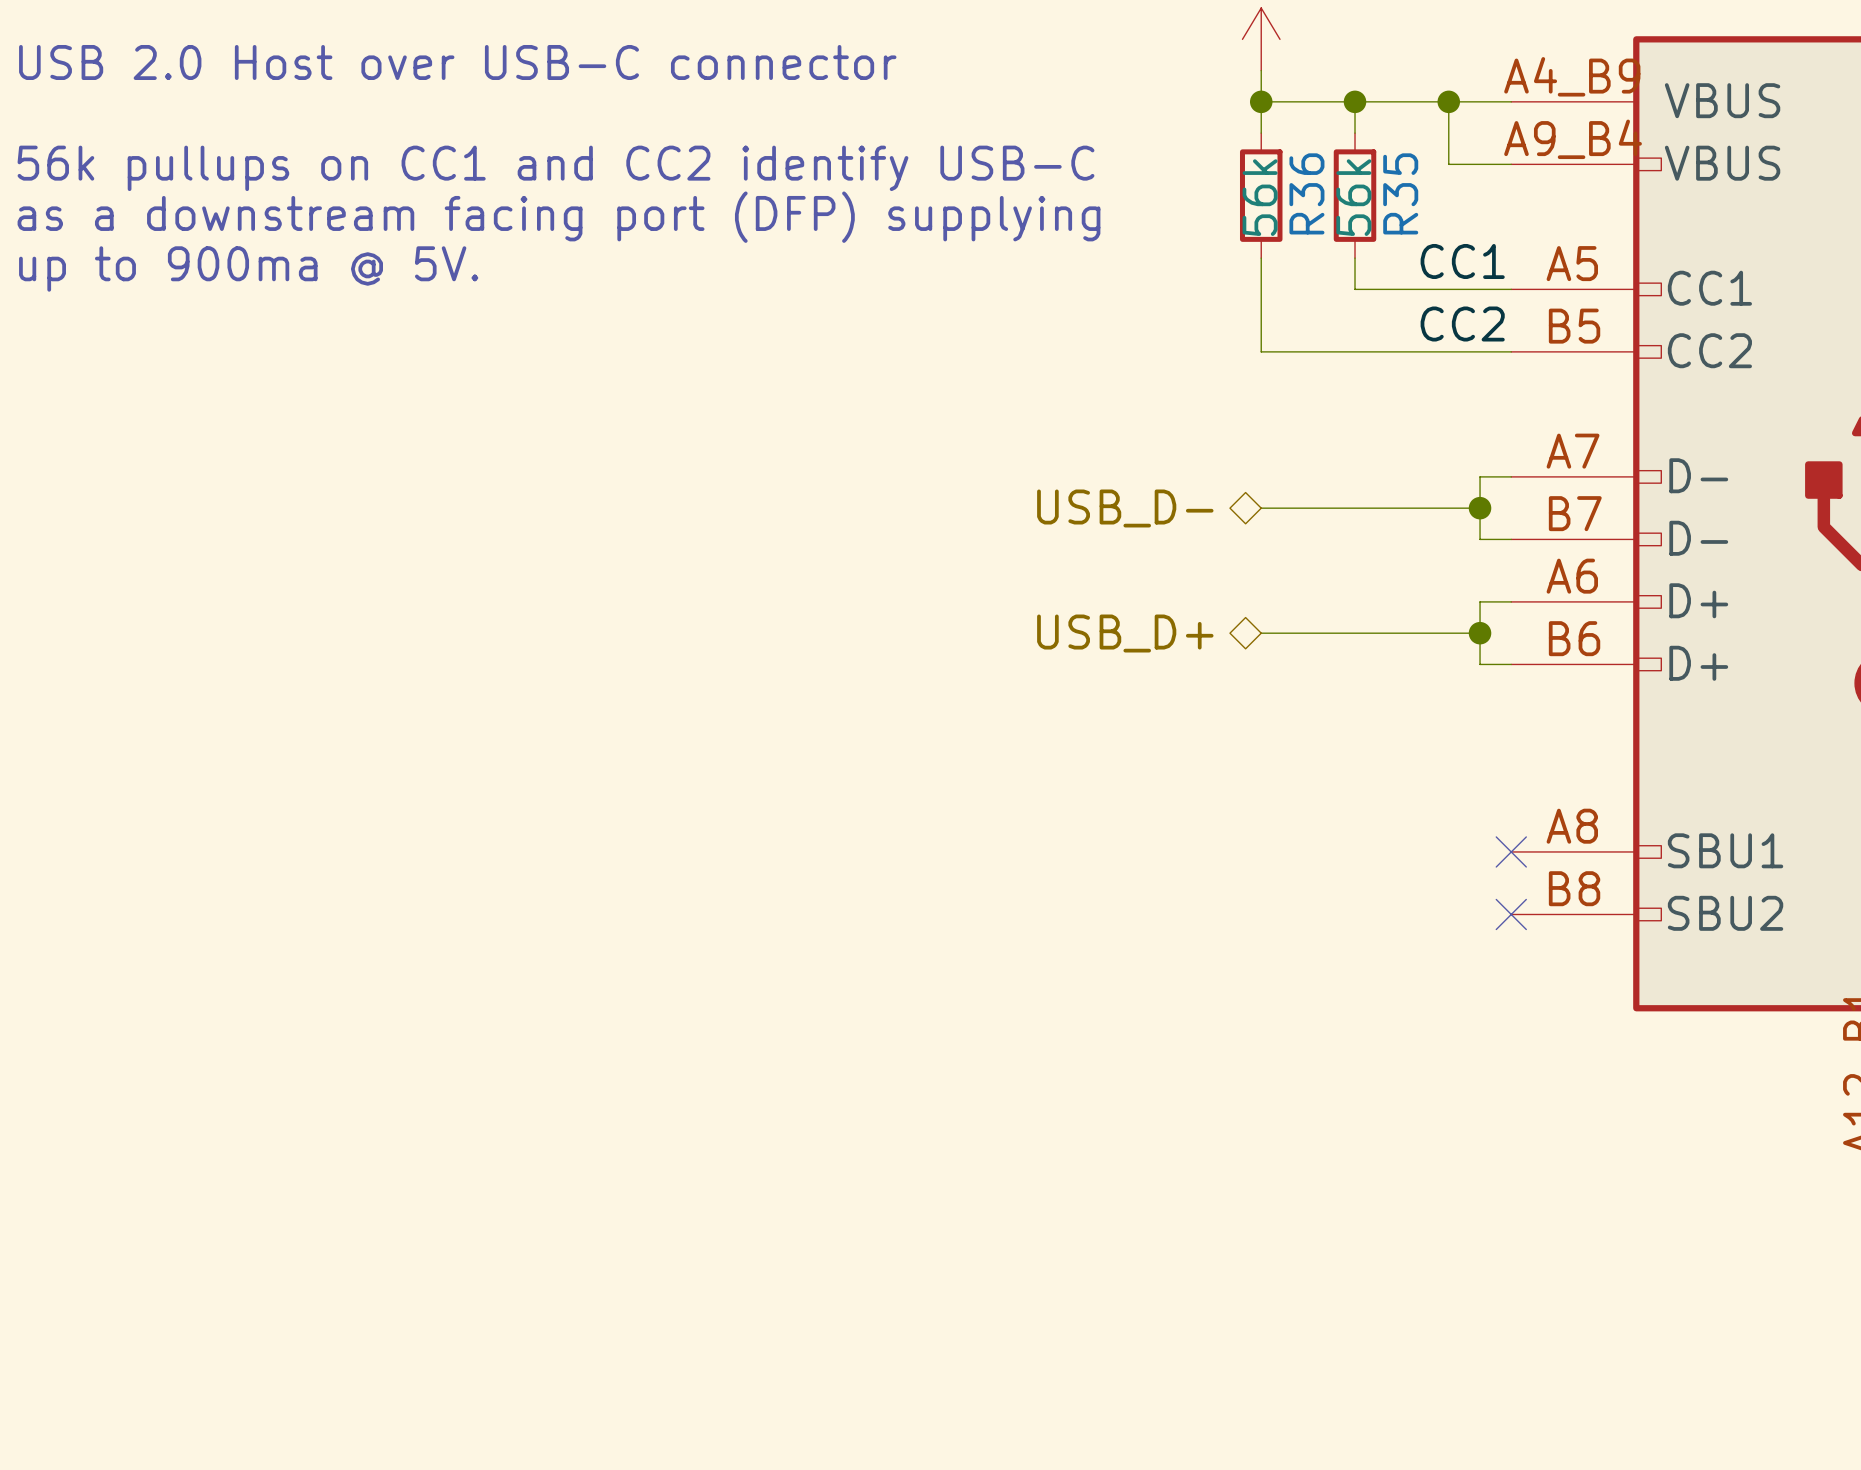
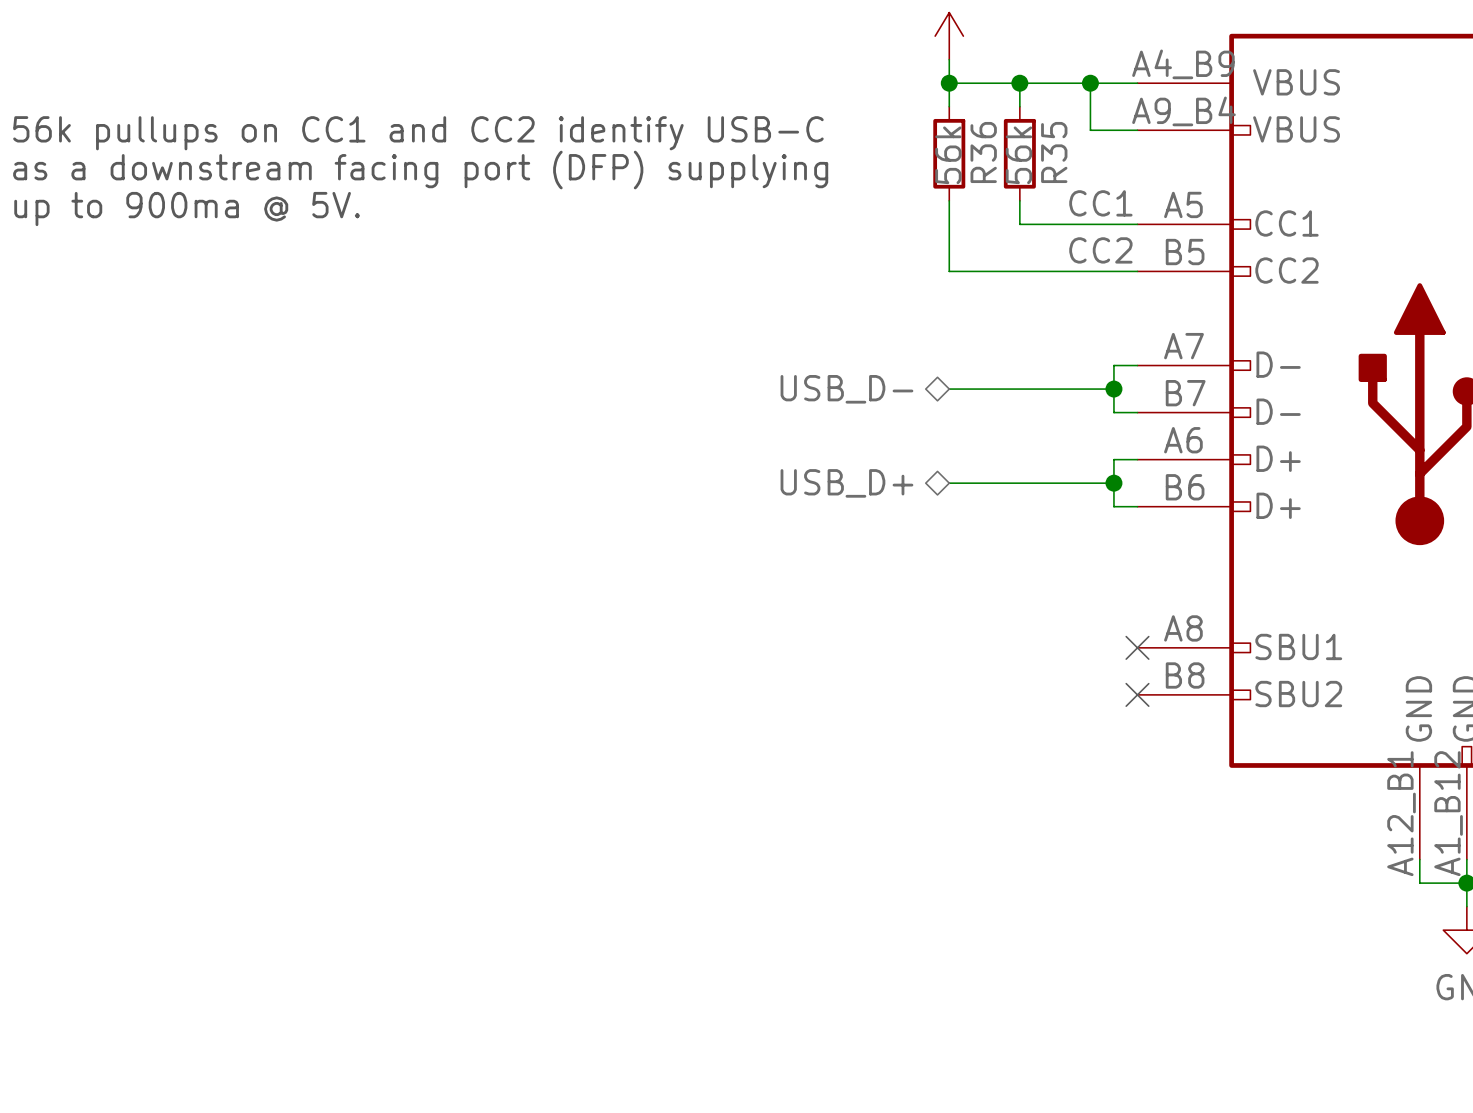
text: USB 2.0 Host over USB-C connector (457, 62) -> none

